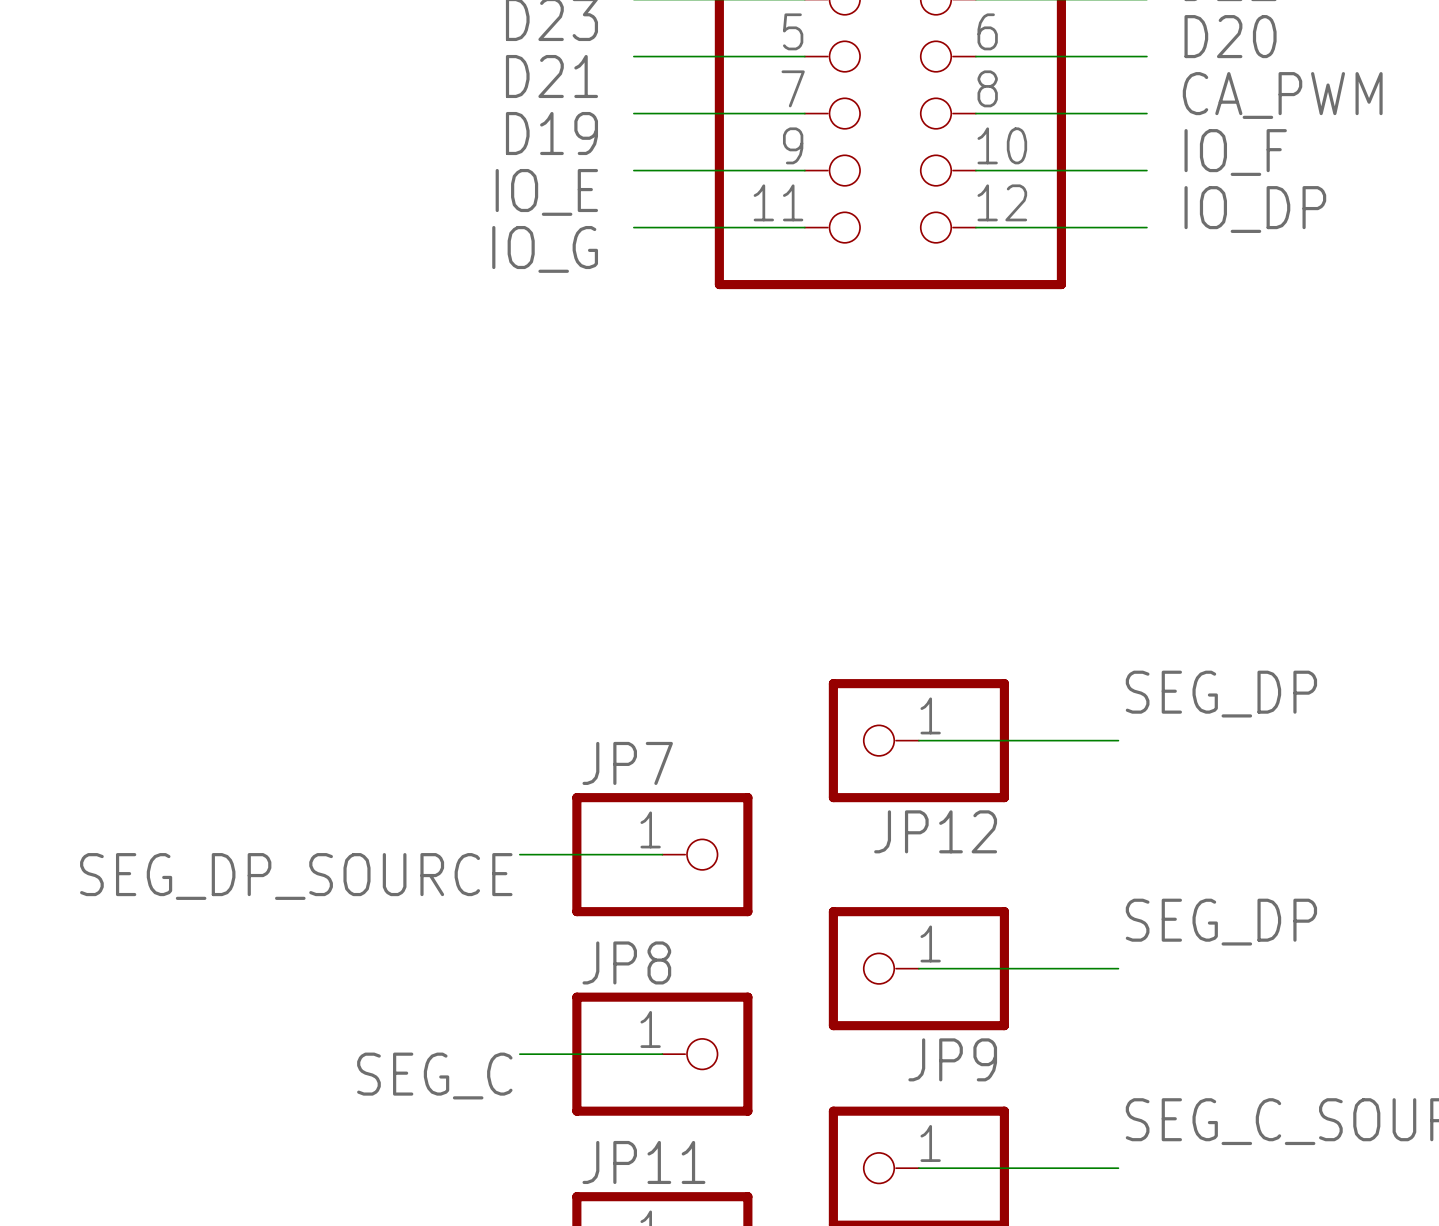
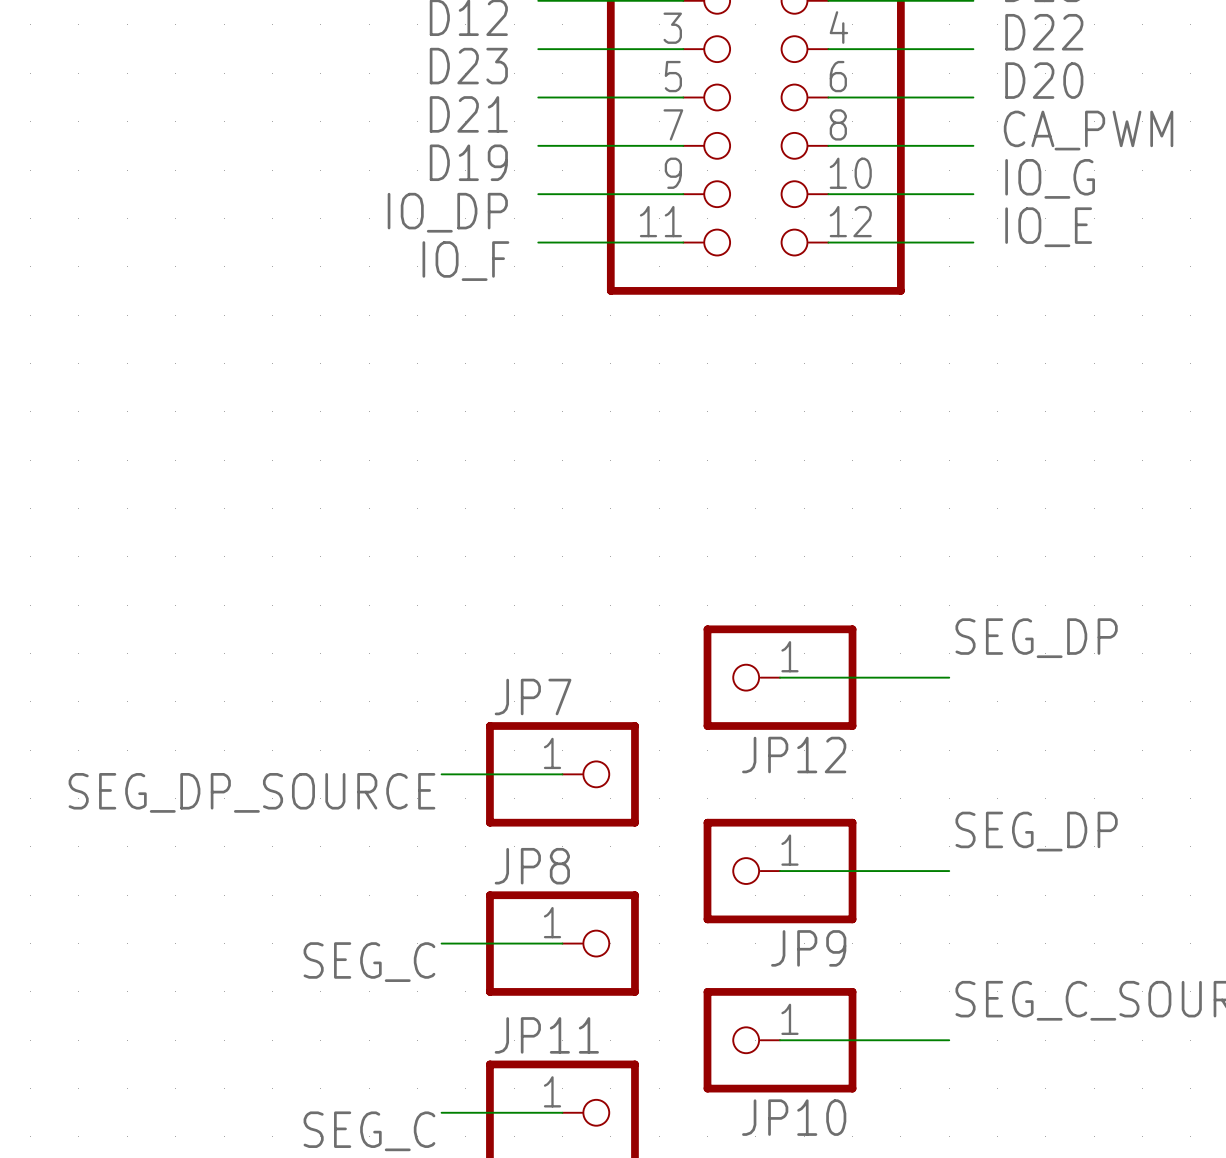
label: IO_F (1235, 152) -> IO_G (1050, 178)
label: IO_E (546, 192) -> IO_DP (447, 212)
label: IO_DP (1255, 209) -> IO_E (1048, 227)
label: IO_G (545, 249) -> IO_F (465, 261)

